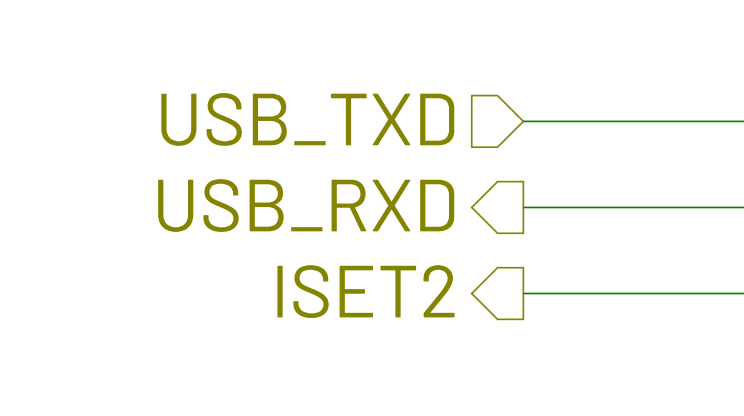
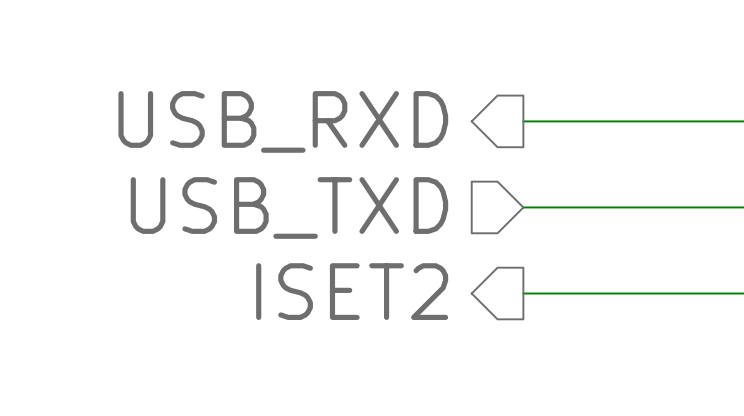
hierarchical label shape: input (307, 119) -> output (283, 121)
hierarchical label: USB_TXD (307, 119) -> USB_RXD (283, 121)
hierarchical label shape: output (306, 205) -> input (289, 207)
hierarchical label: USB_RXD (306, 205) -> USB_TXD (289, 207)

